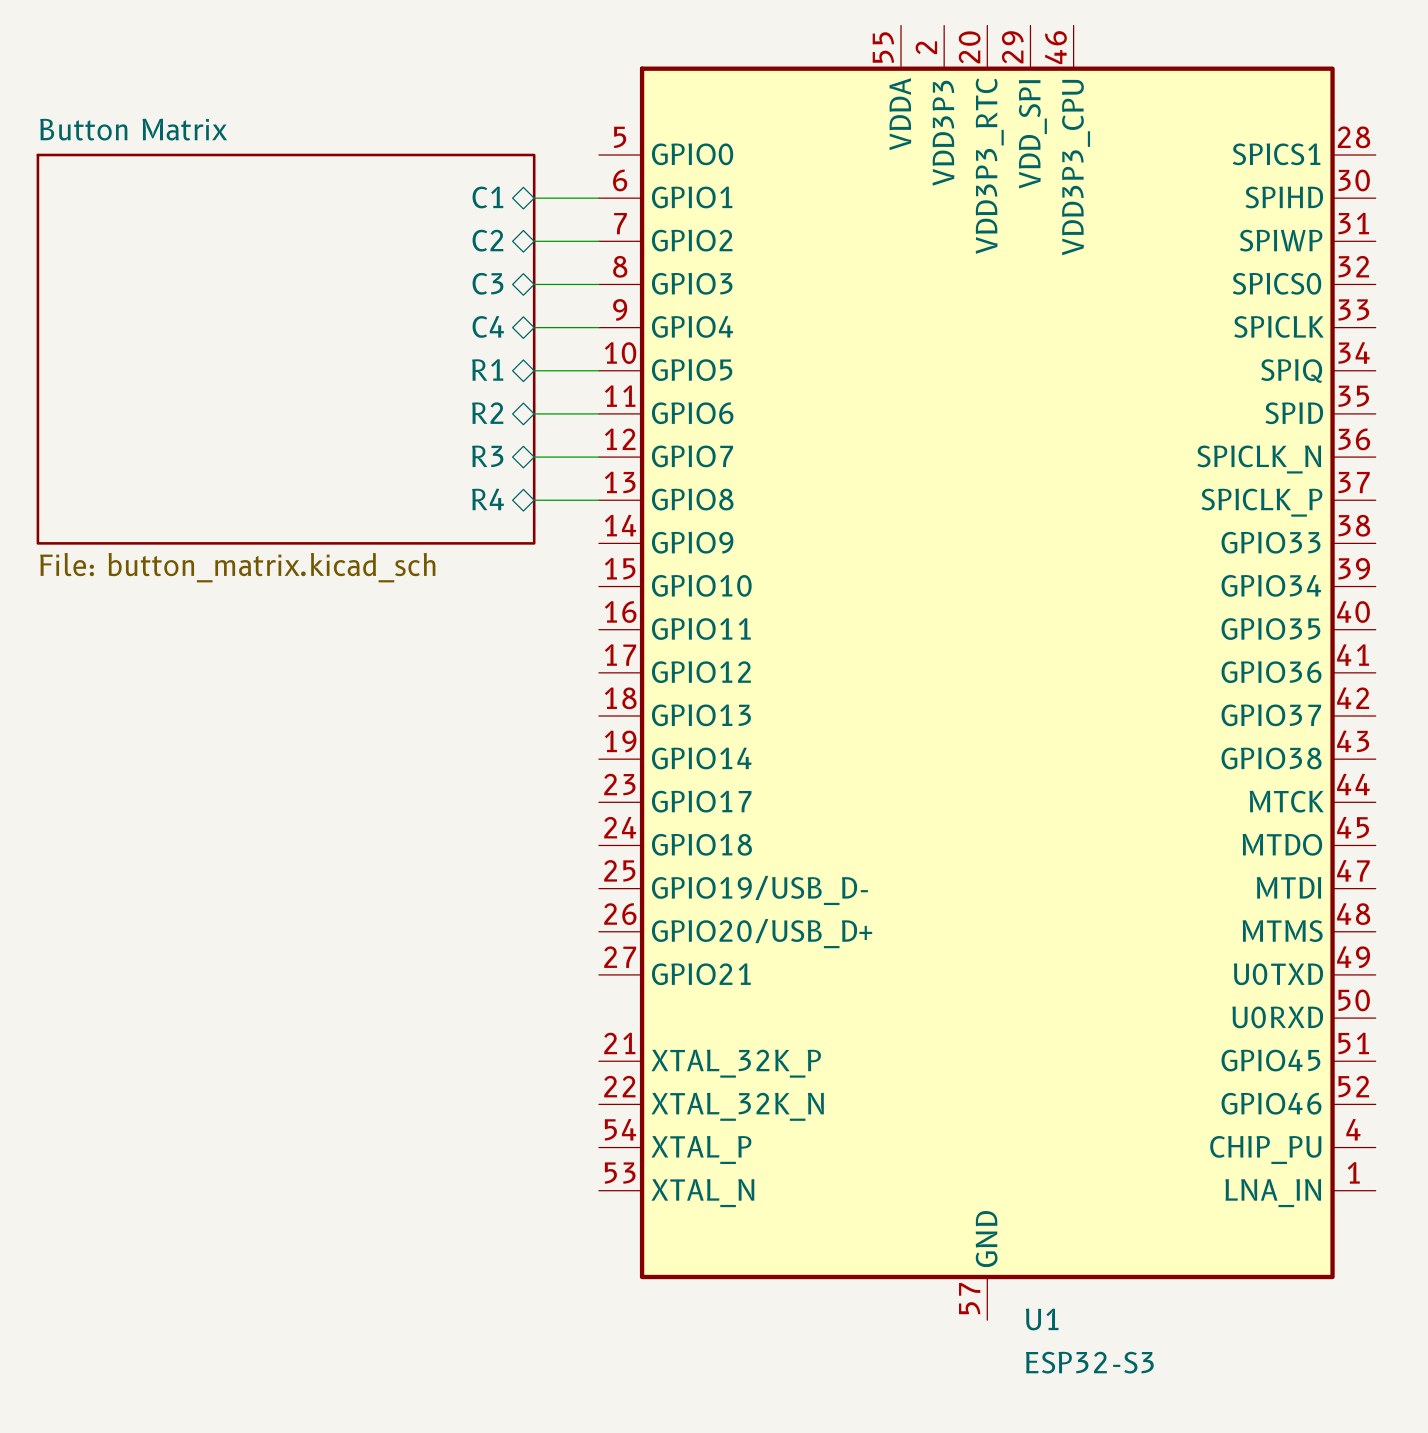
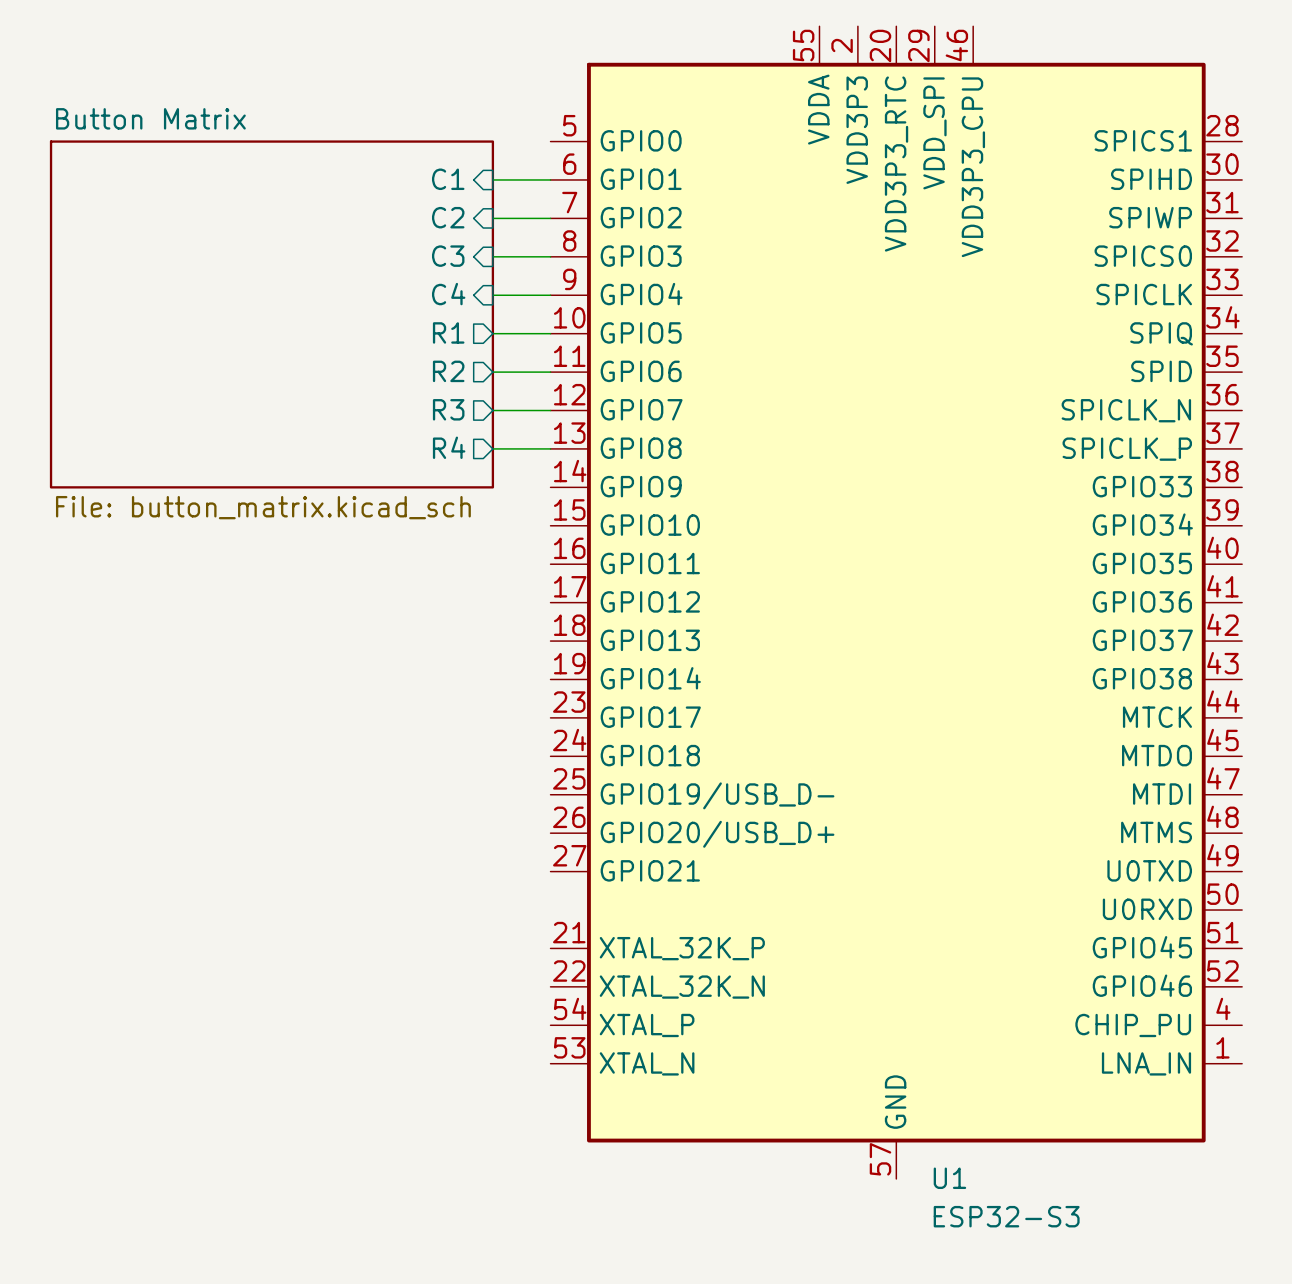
sheet pin shape: bidirectional (487, 197) -> input (448, 179)
sheet pin shape: bidirectional (487, 240) -> input (448, 217)
sheet pin shape: bidirectional (487, 283) -> input (448, 256)
sheet pin shape: bidirectional (488, 326) -> input (448, 294)
sheet pin shape: bidirectional (487, 369) -> output (448, 332)
sheet pin shape: bidirectional (487, 413) -> output (448, 371)
sheet pin shape: bidirectional (487, 456) -> output (448, 409)
sheet pin shape: bidirectional (488, 499) -> output (449, 447)

